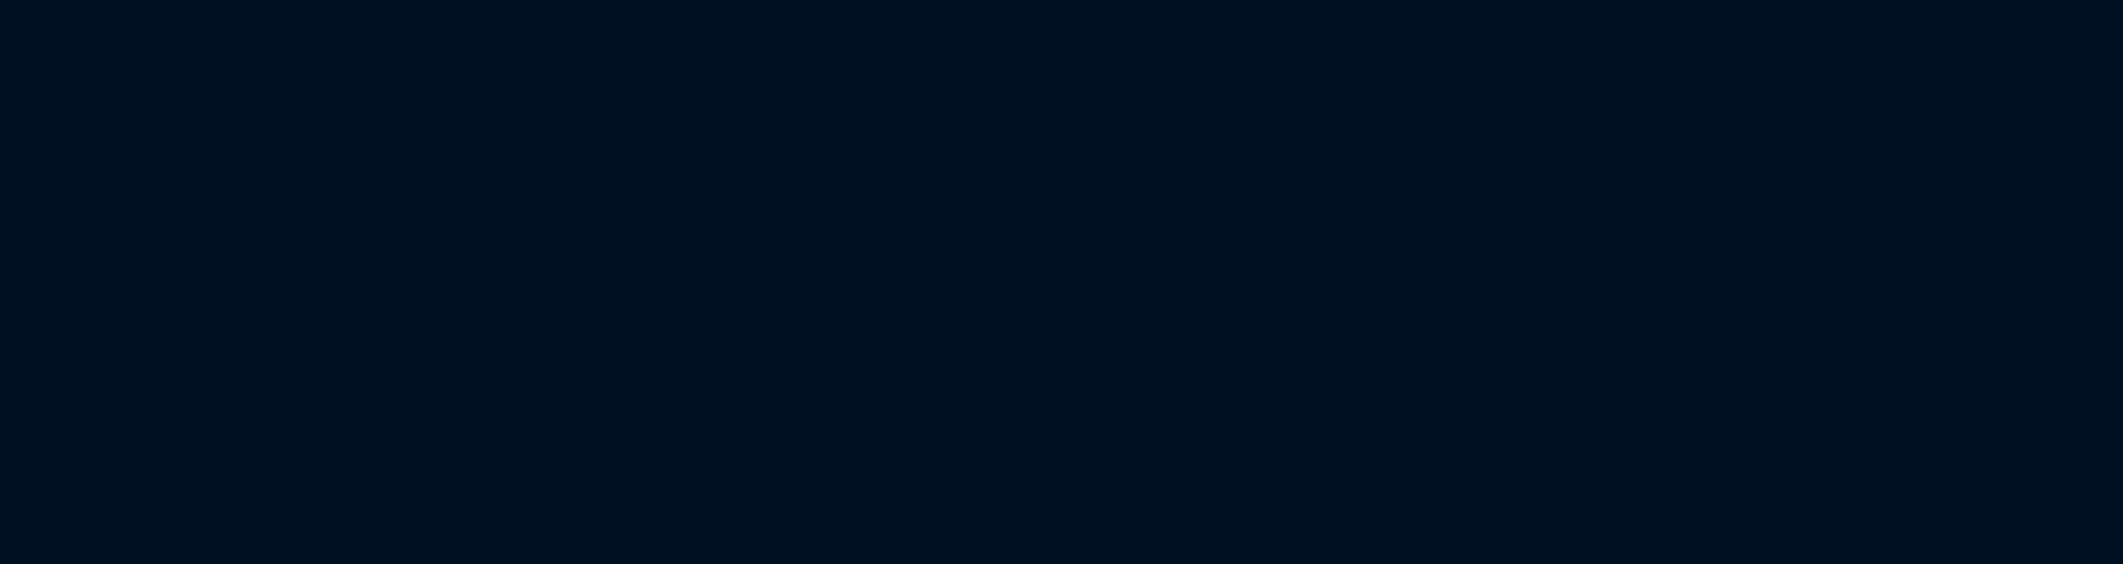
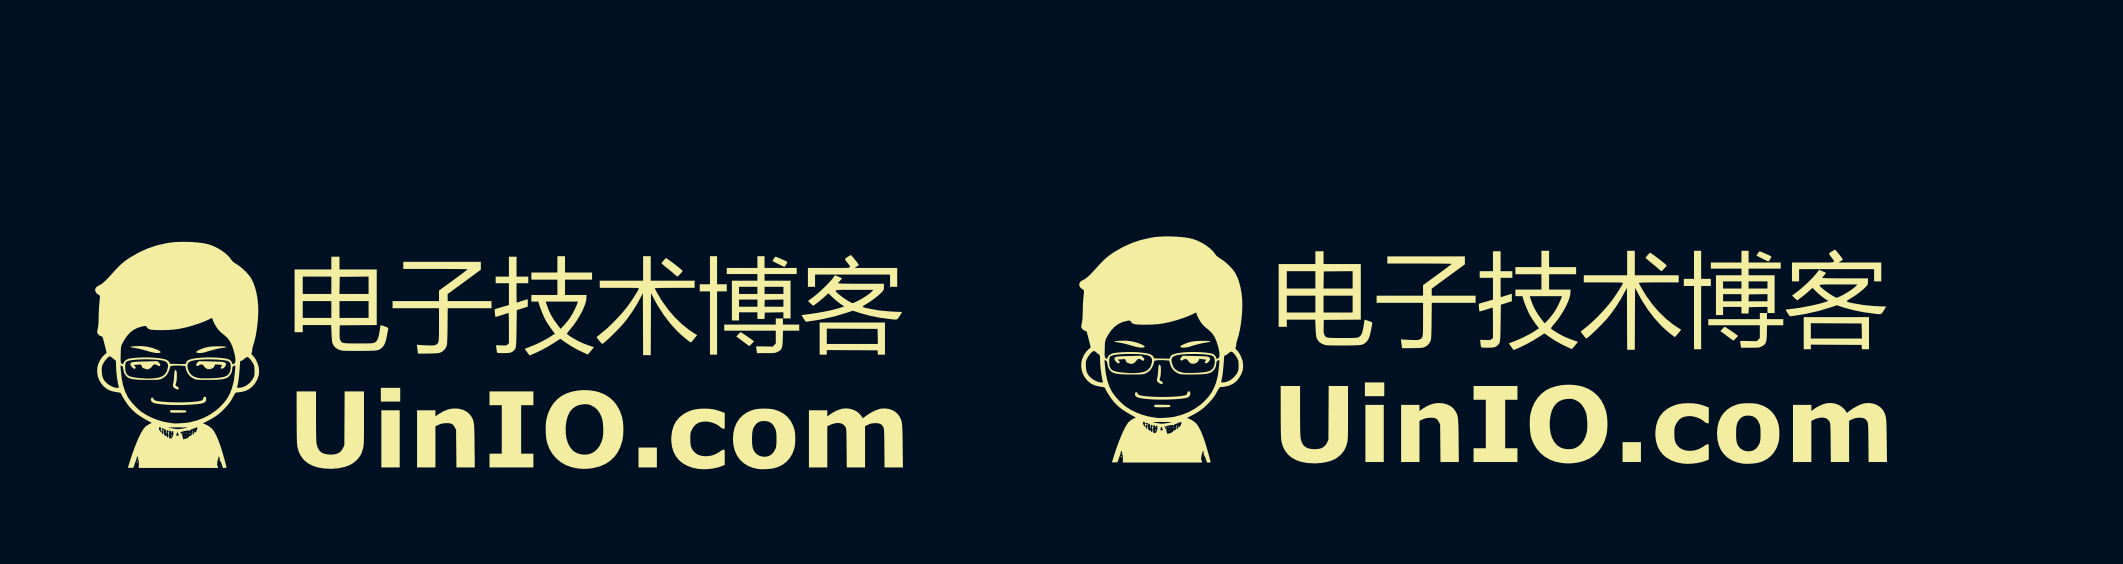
drawing: none -> [1079, 236, 1887, 464]
drawing: none -> [95, 241, 903, 470]

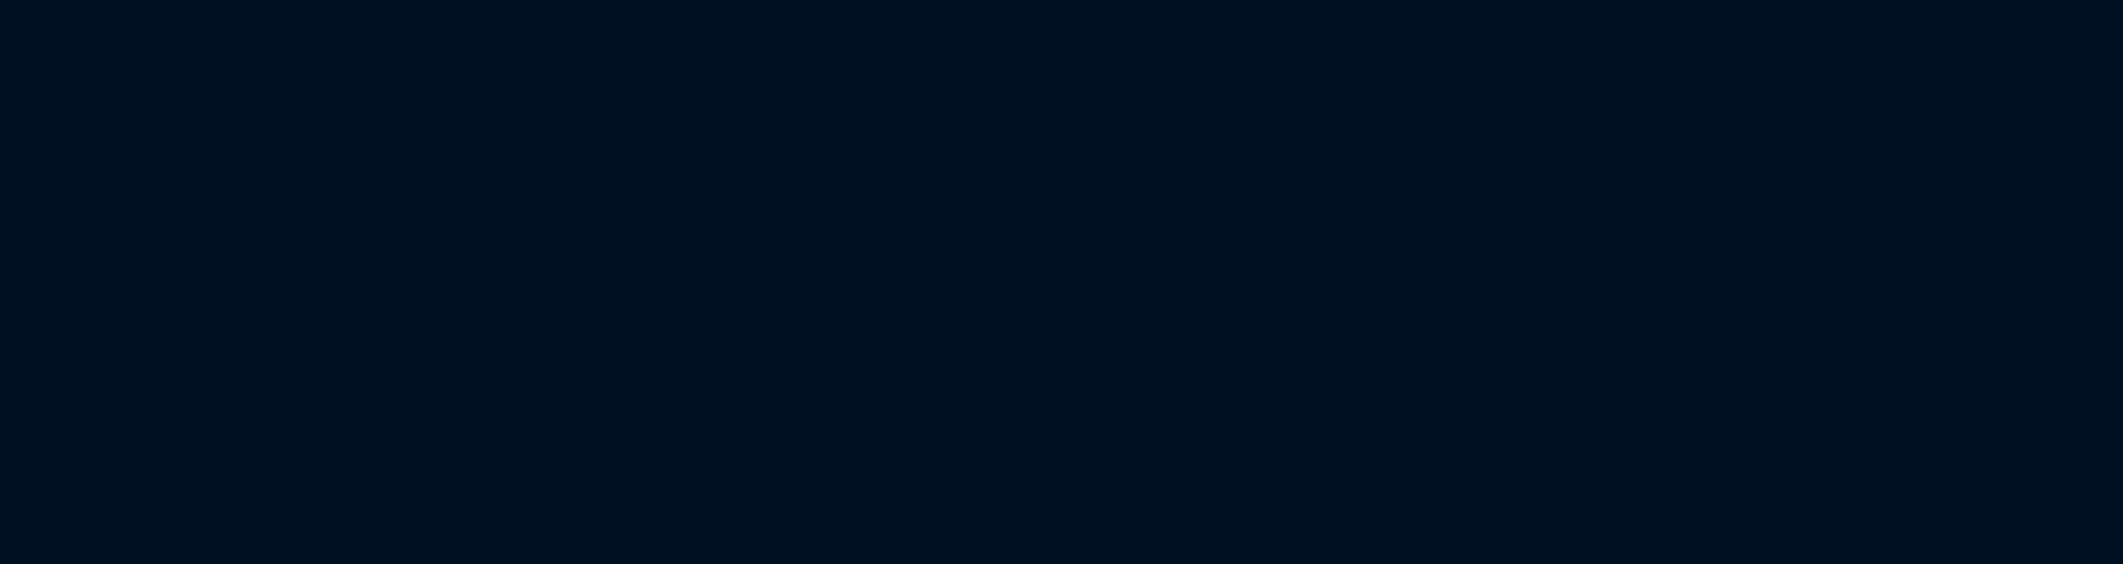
drawing: [1079, 236, 1887, 464] -> none
drawing: [95, 241, 903, 470] -> none

